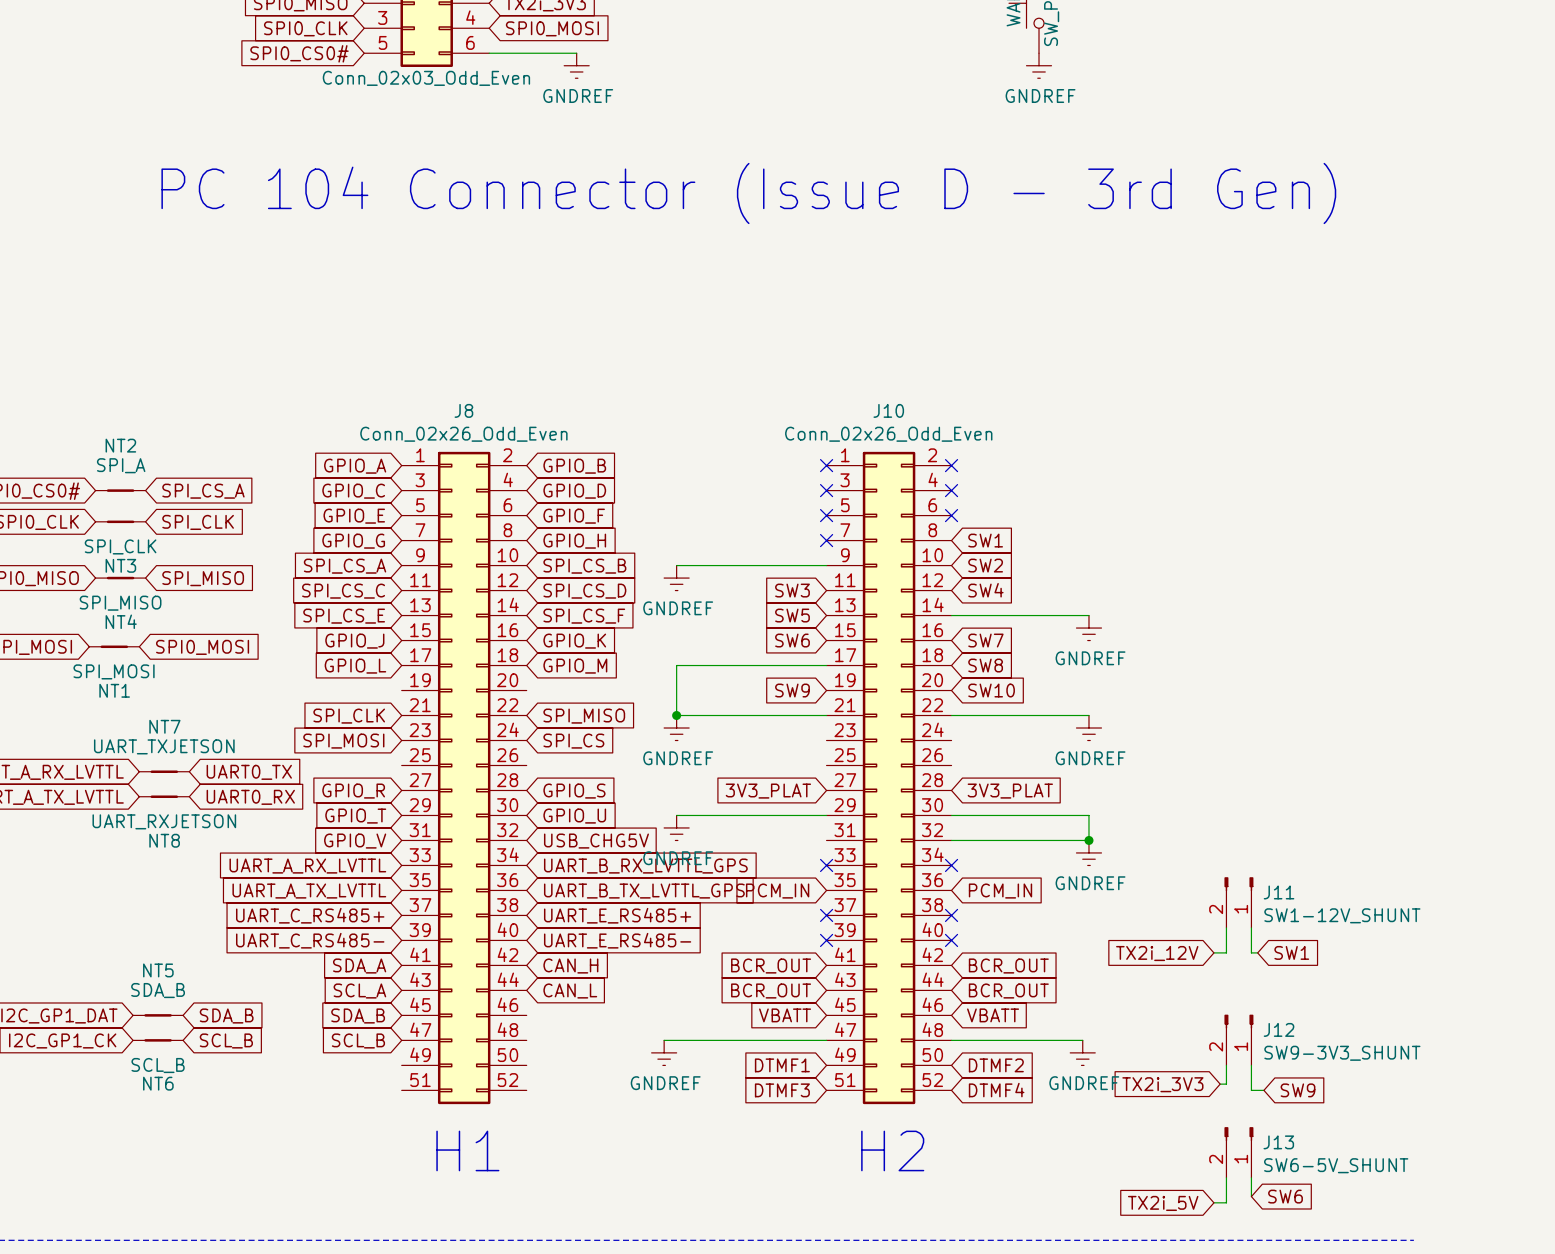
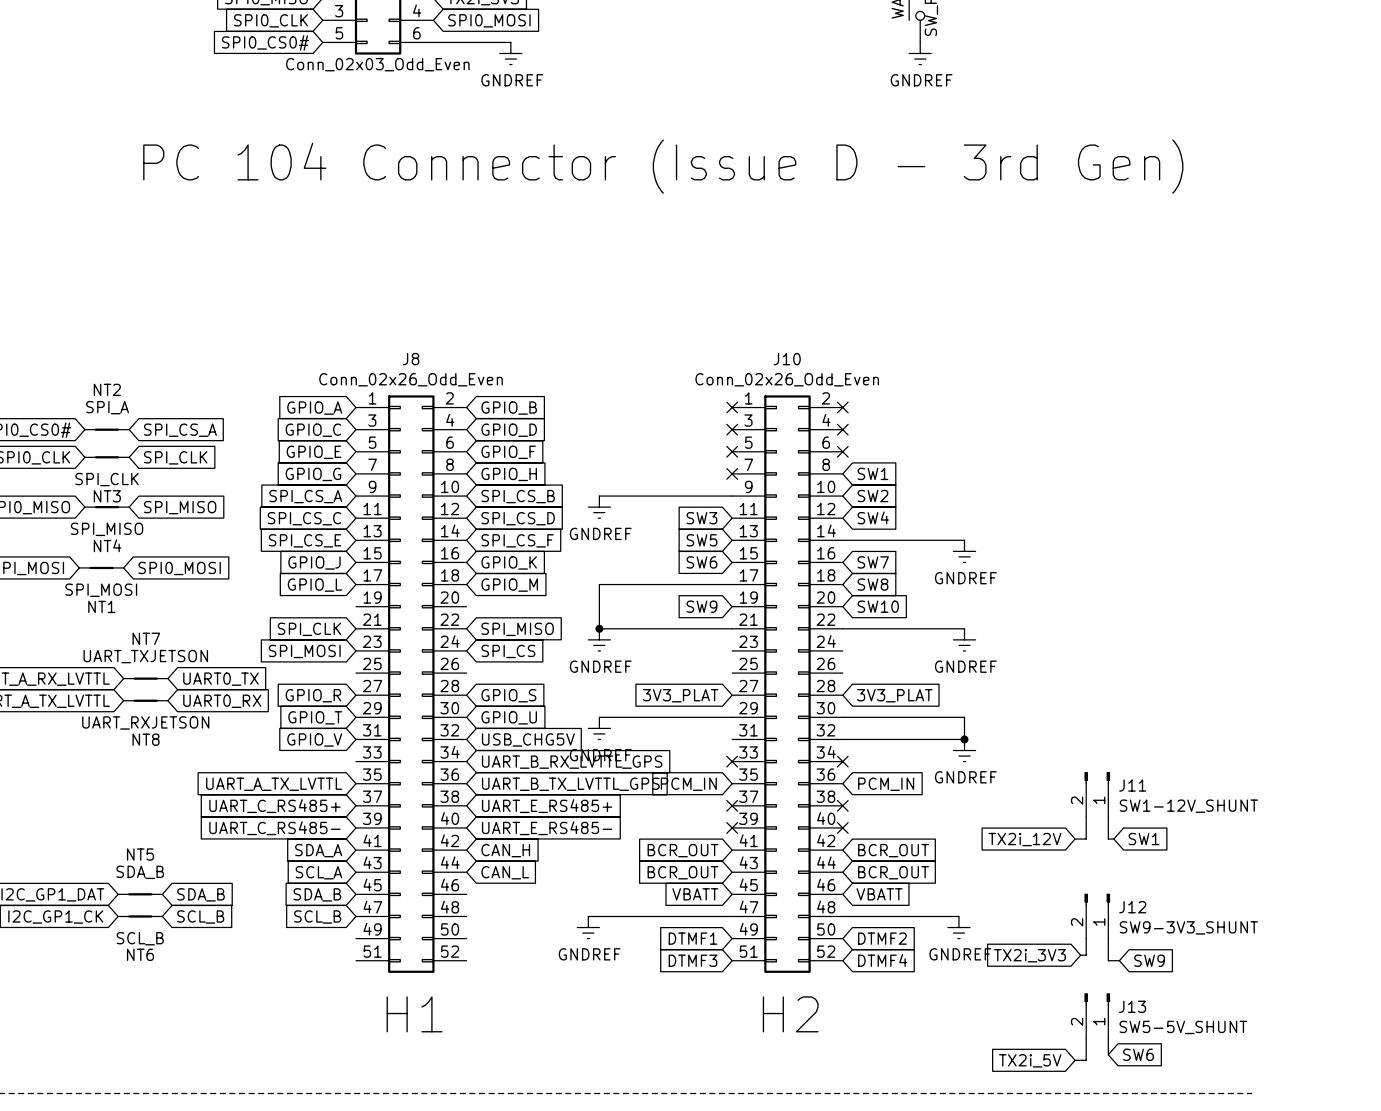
global label: UART_A_RX_LVTTL (307, 866) -> none
J13 value: SW6-5V_SHUNT (1336, 1165) -> SW5-5V_SHUNT (1183, 1027)

